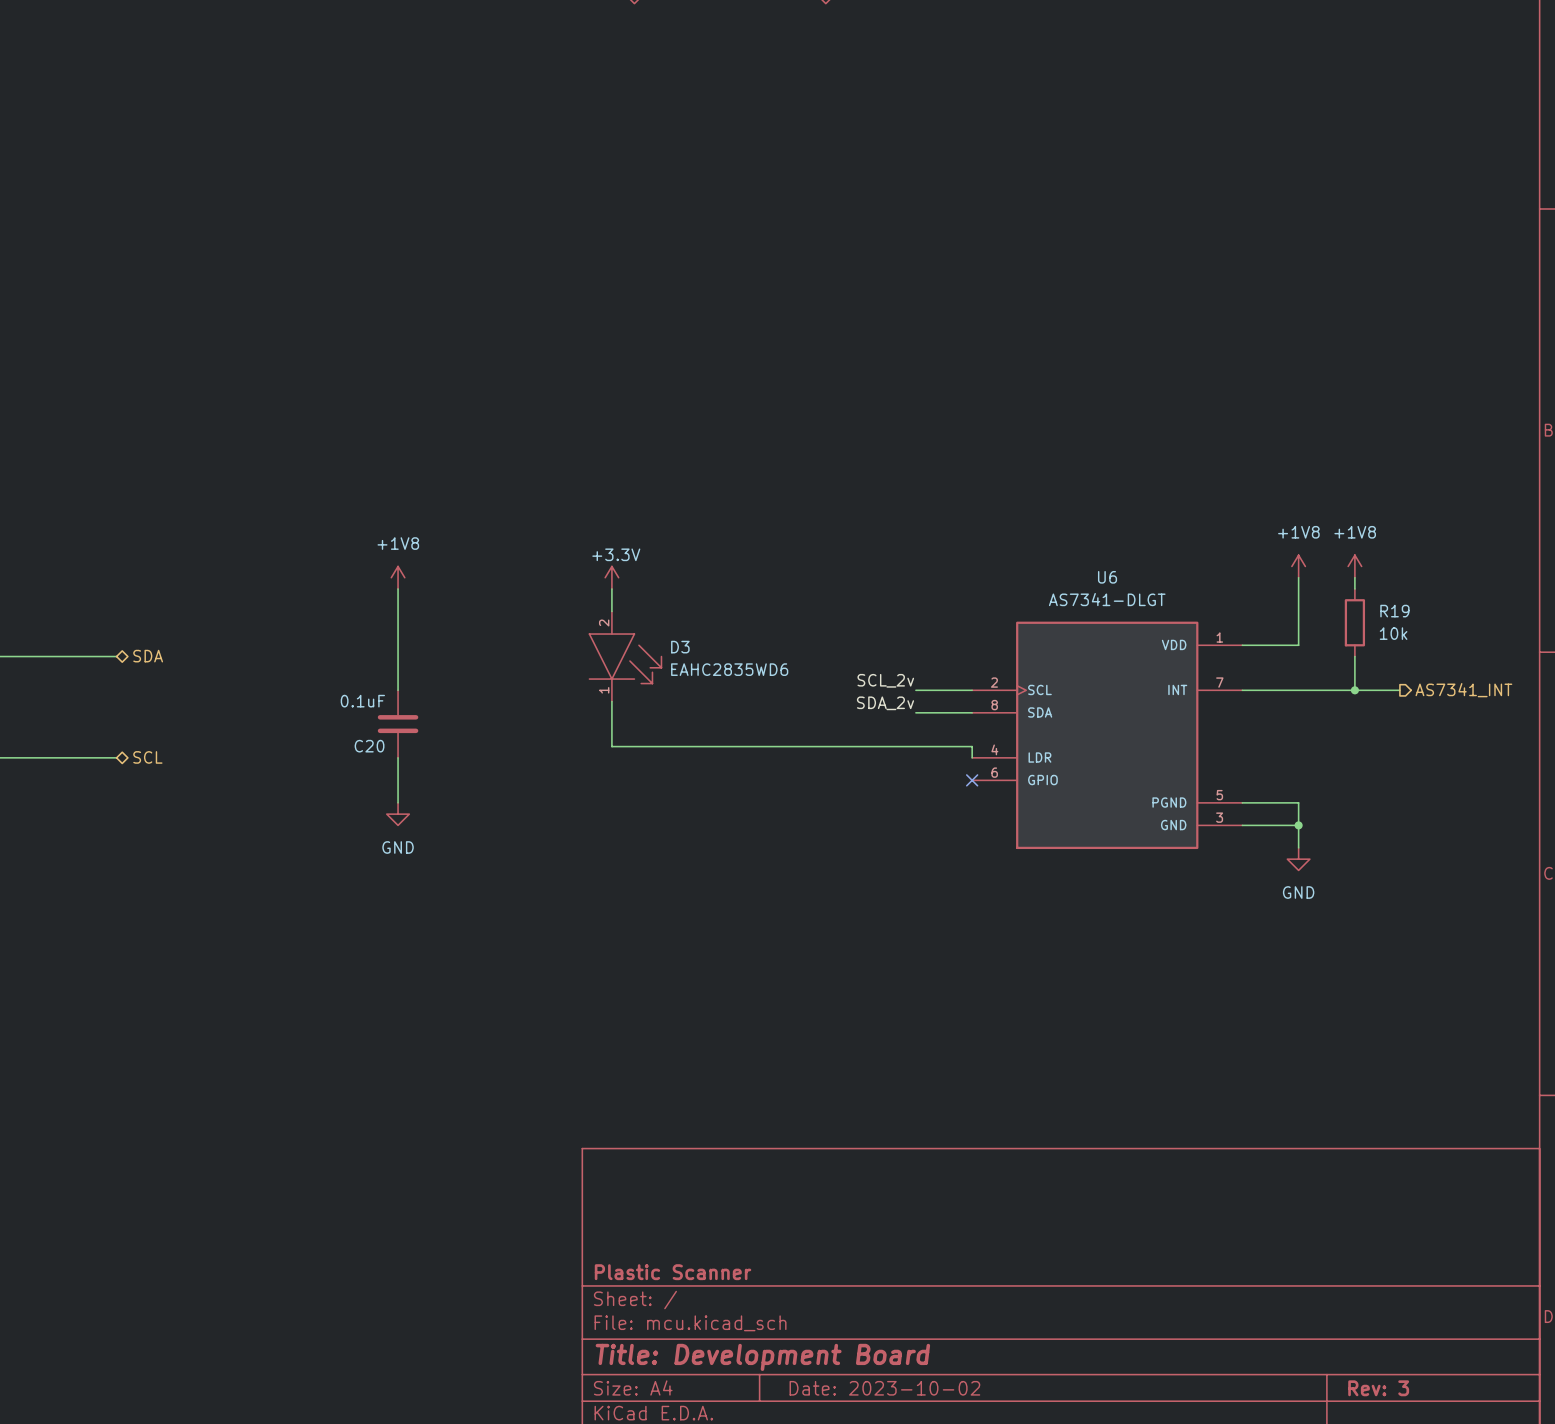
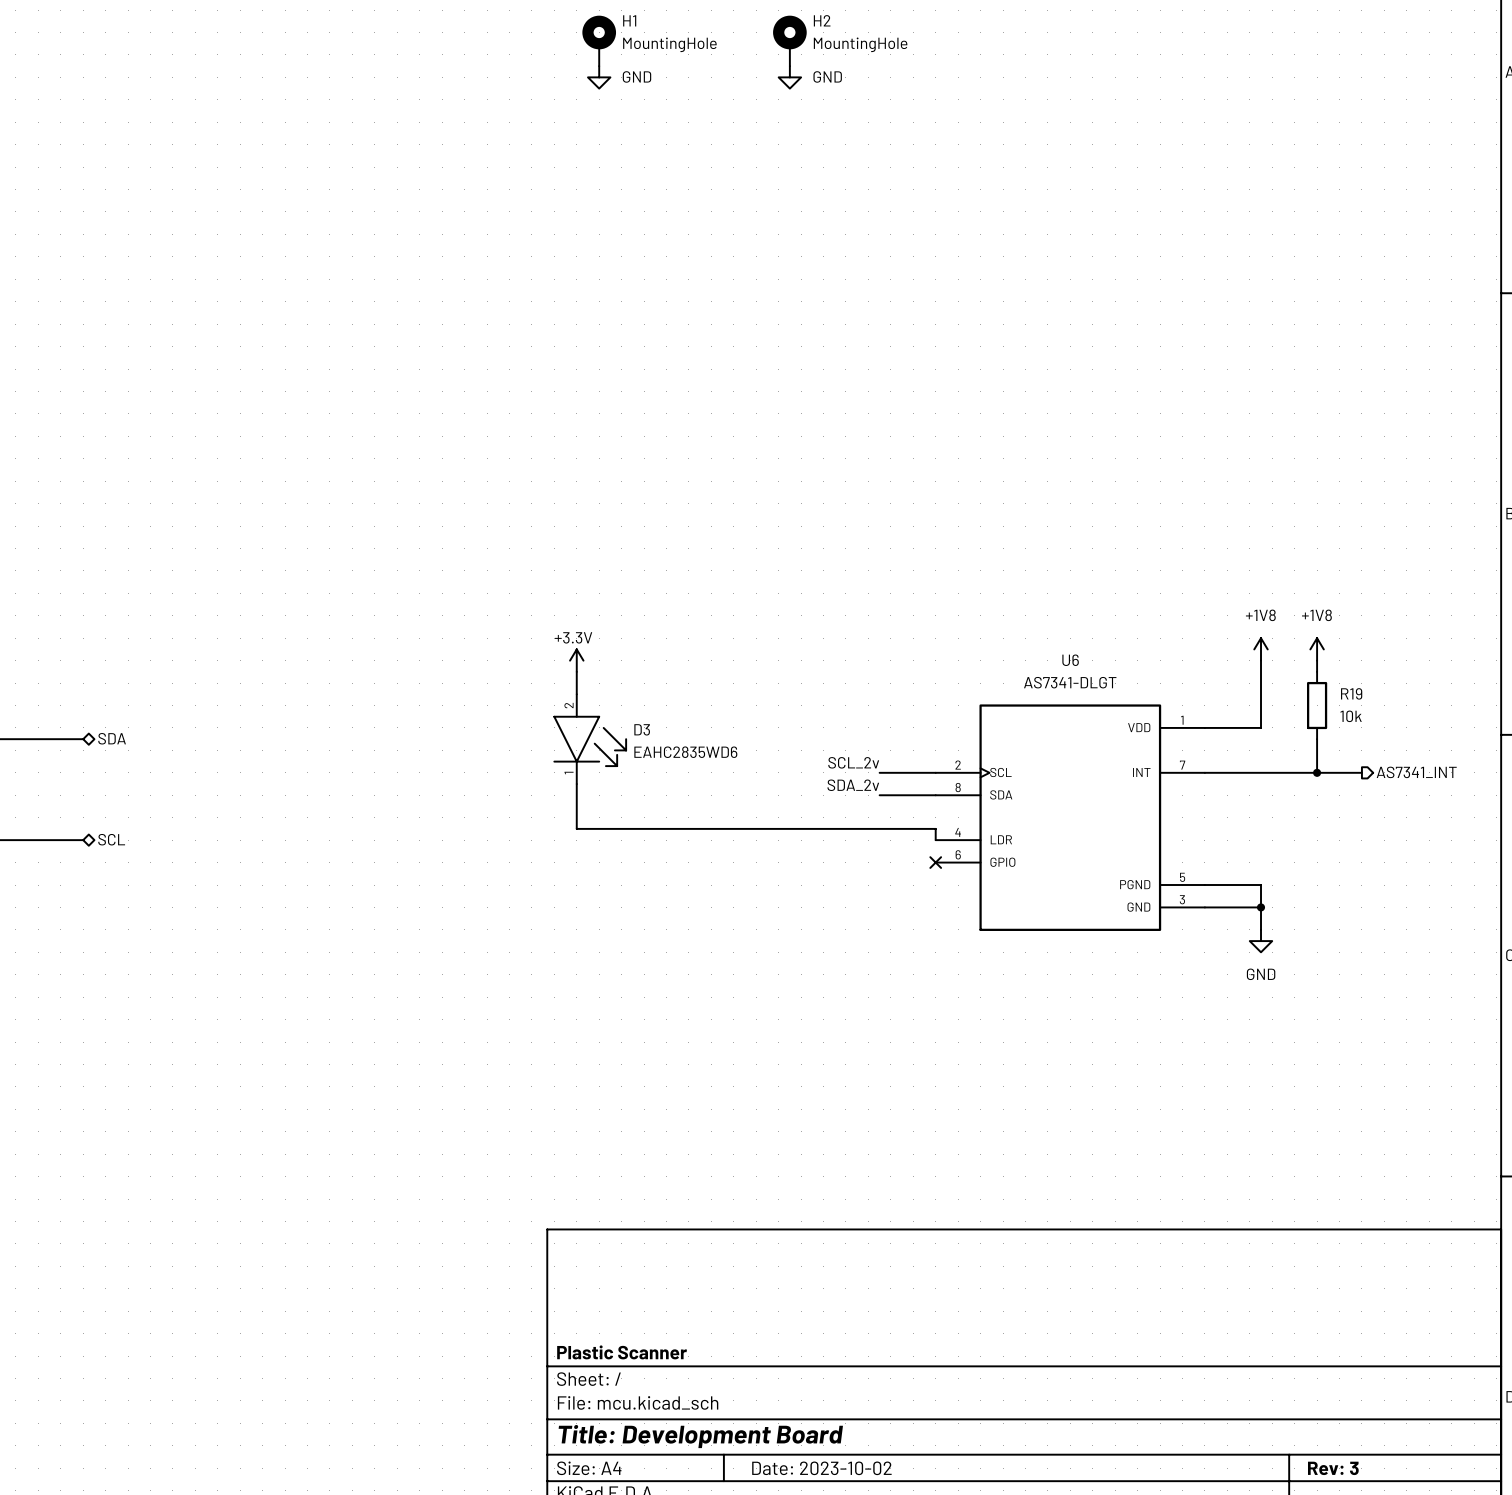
power symbol: +1V8 (398, 577) -> none
wire: (398, 588) (398, 690) -> none
C20: 0.1uF (398, 724) -> none
wire: (398, 757) (398, 802) -> none
power symbol: GND (398, 814) -> none

